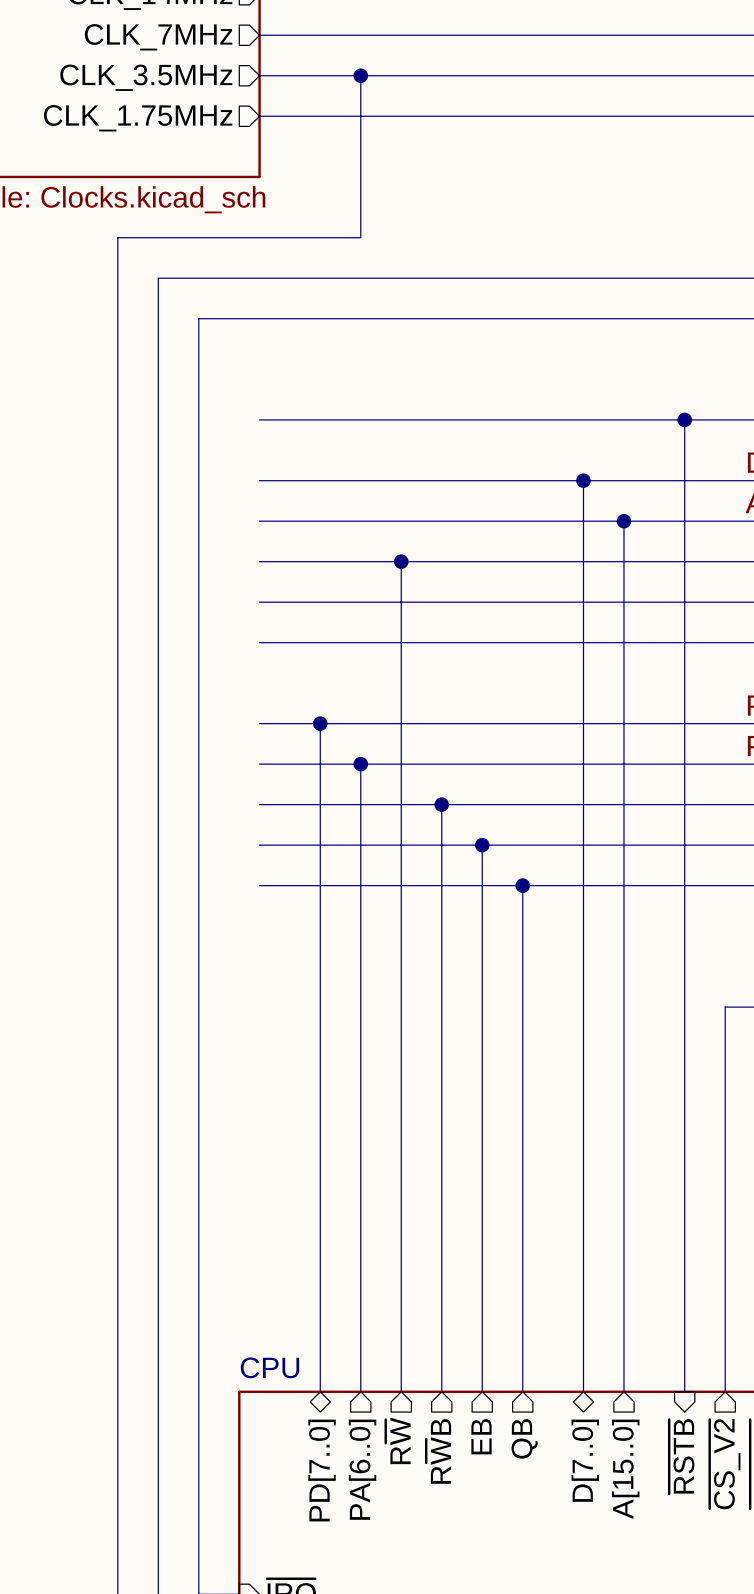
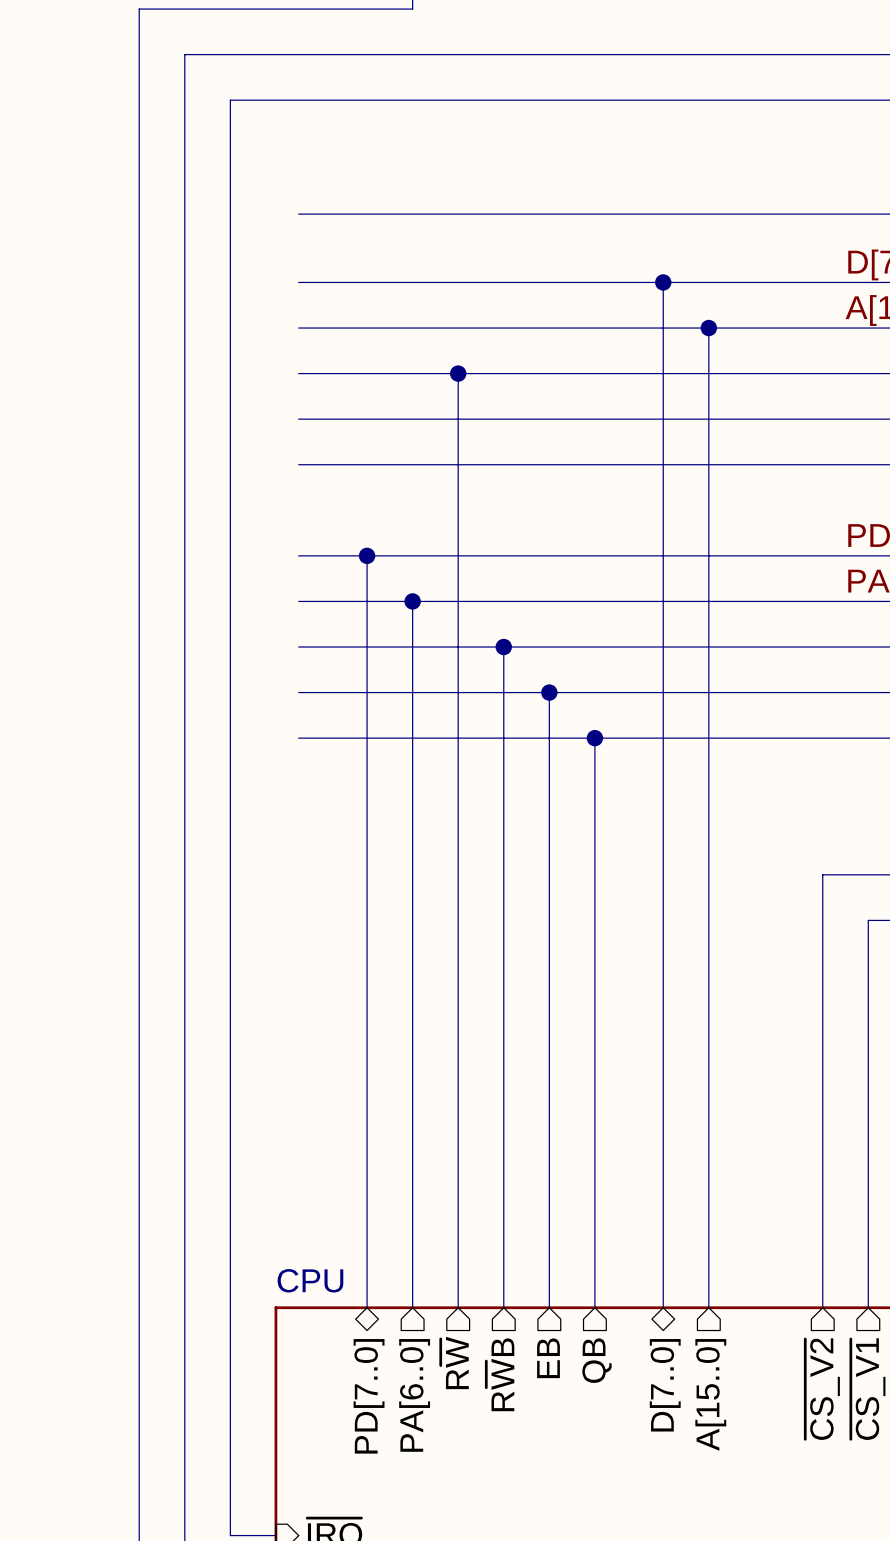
wire: (684, 419) (684, 1391) -> none
junction: (684, 419) -> none
sheet pin: ~{RSTB} (681, 1456) -> none

